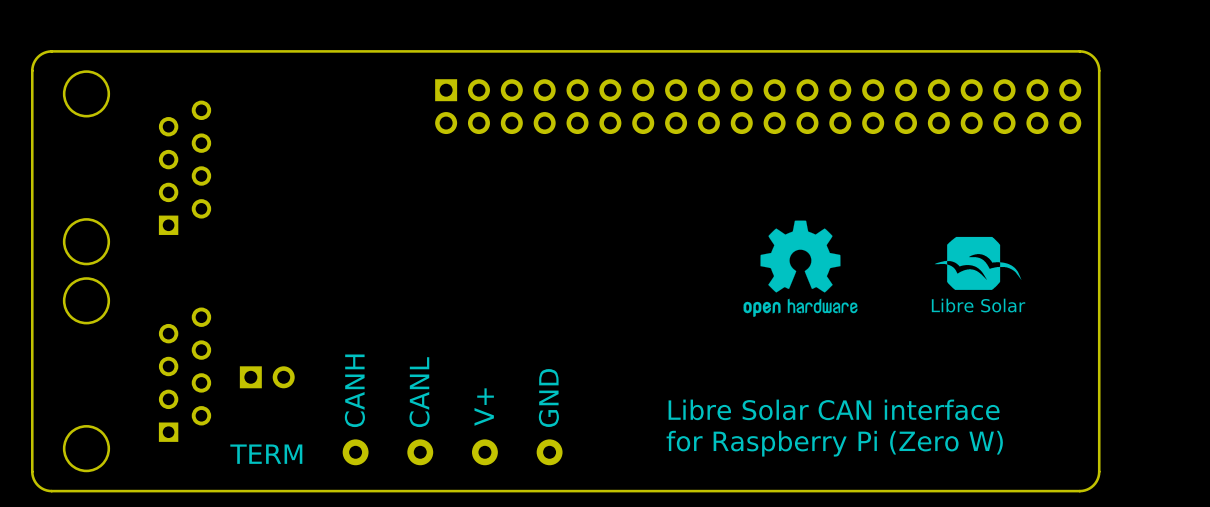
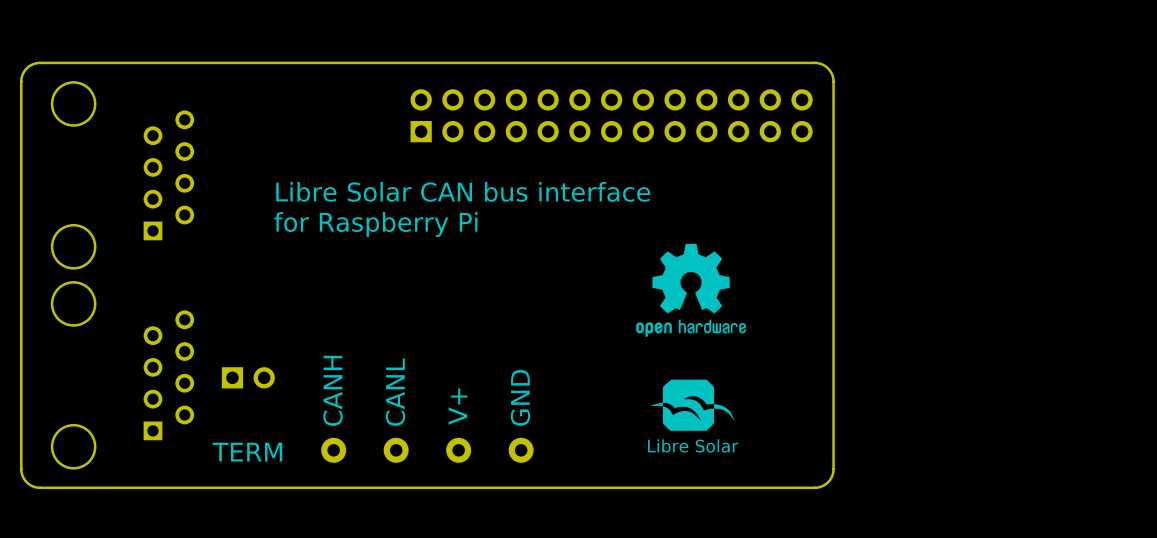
board edge: (853, 51) (1082, 51) (1095, 58) (1099, 70) (1099, 471) (1096, 481) (1089, 488) (1079, 491) (853, 491) -> (814, 62) (828, 68) (833, 81) (833, 469) (828, 482) (814, 487)
part: none -> (611, 115)
part: (758, 106) -> none
text: none -> Libre Solar CAN bus interface (463, 191)
text: none -> for Raspberry Pi (375, 224)
drawing position: (978, 263) -> (692, 405)
drawing position: (800, 268) -> (691, 290)
text: Libre Solar CAN interface (834, 409) -> none
text: for Raspberry Pi (Zero W) (834, 443) -> none

